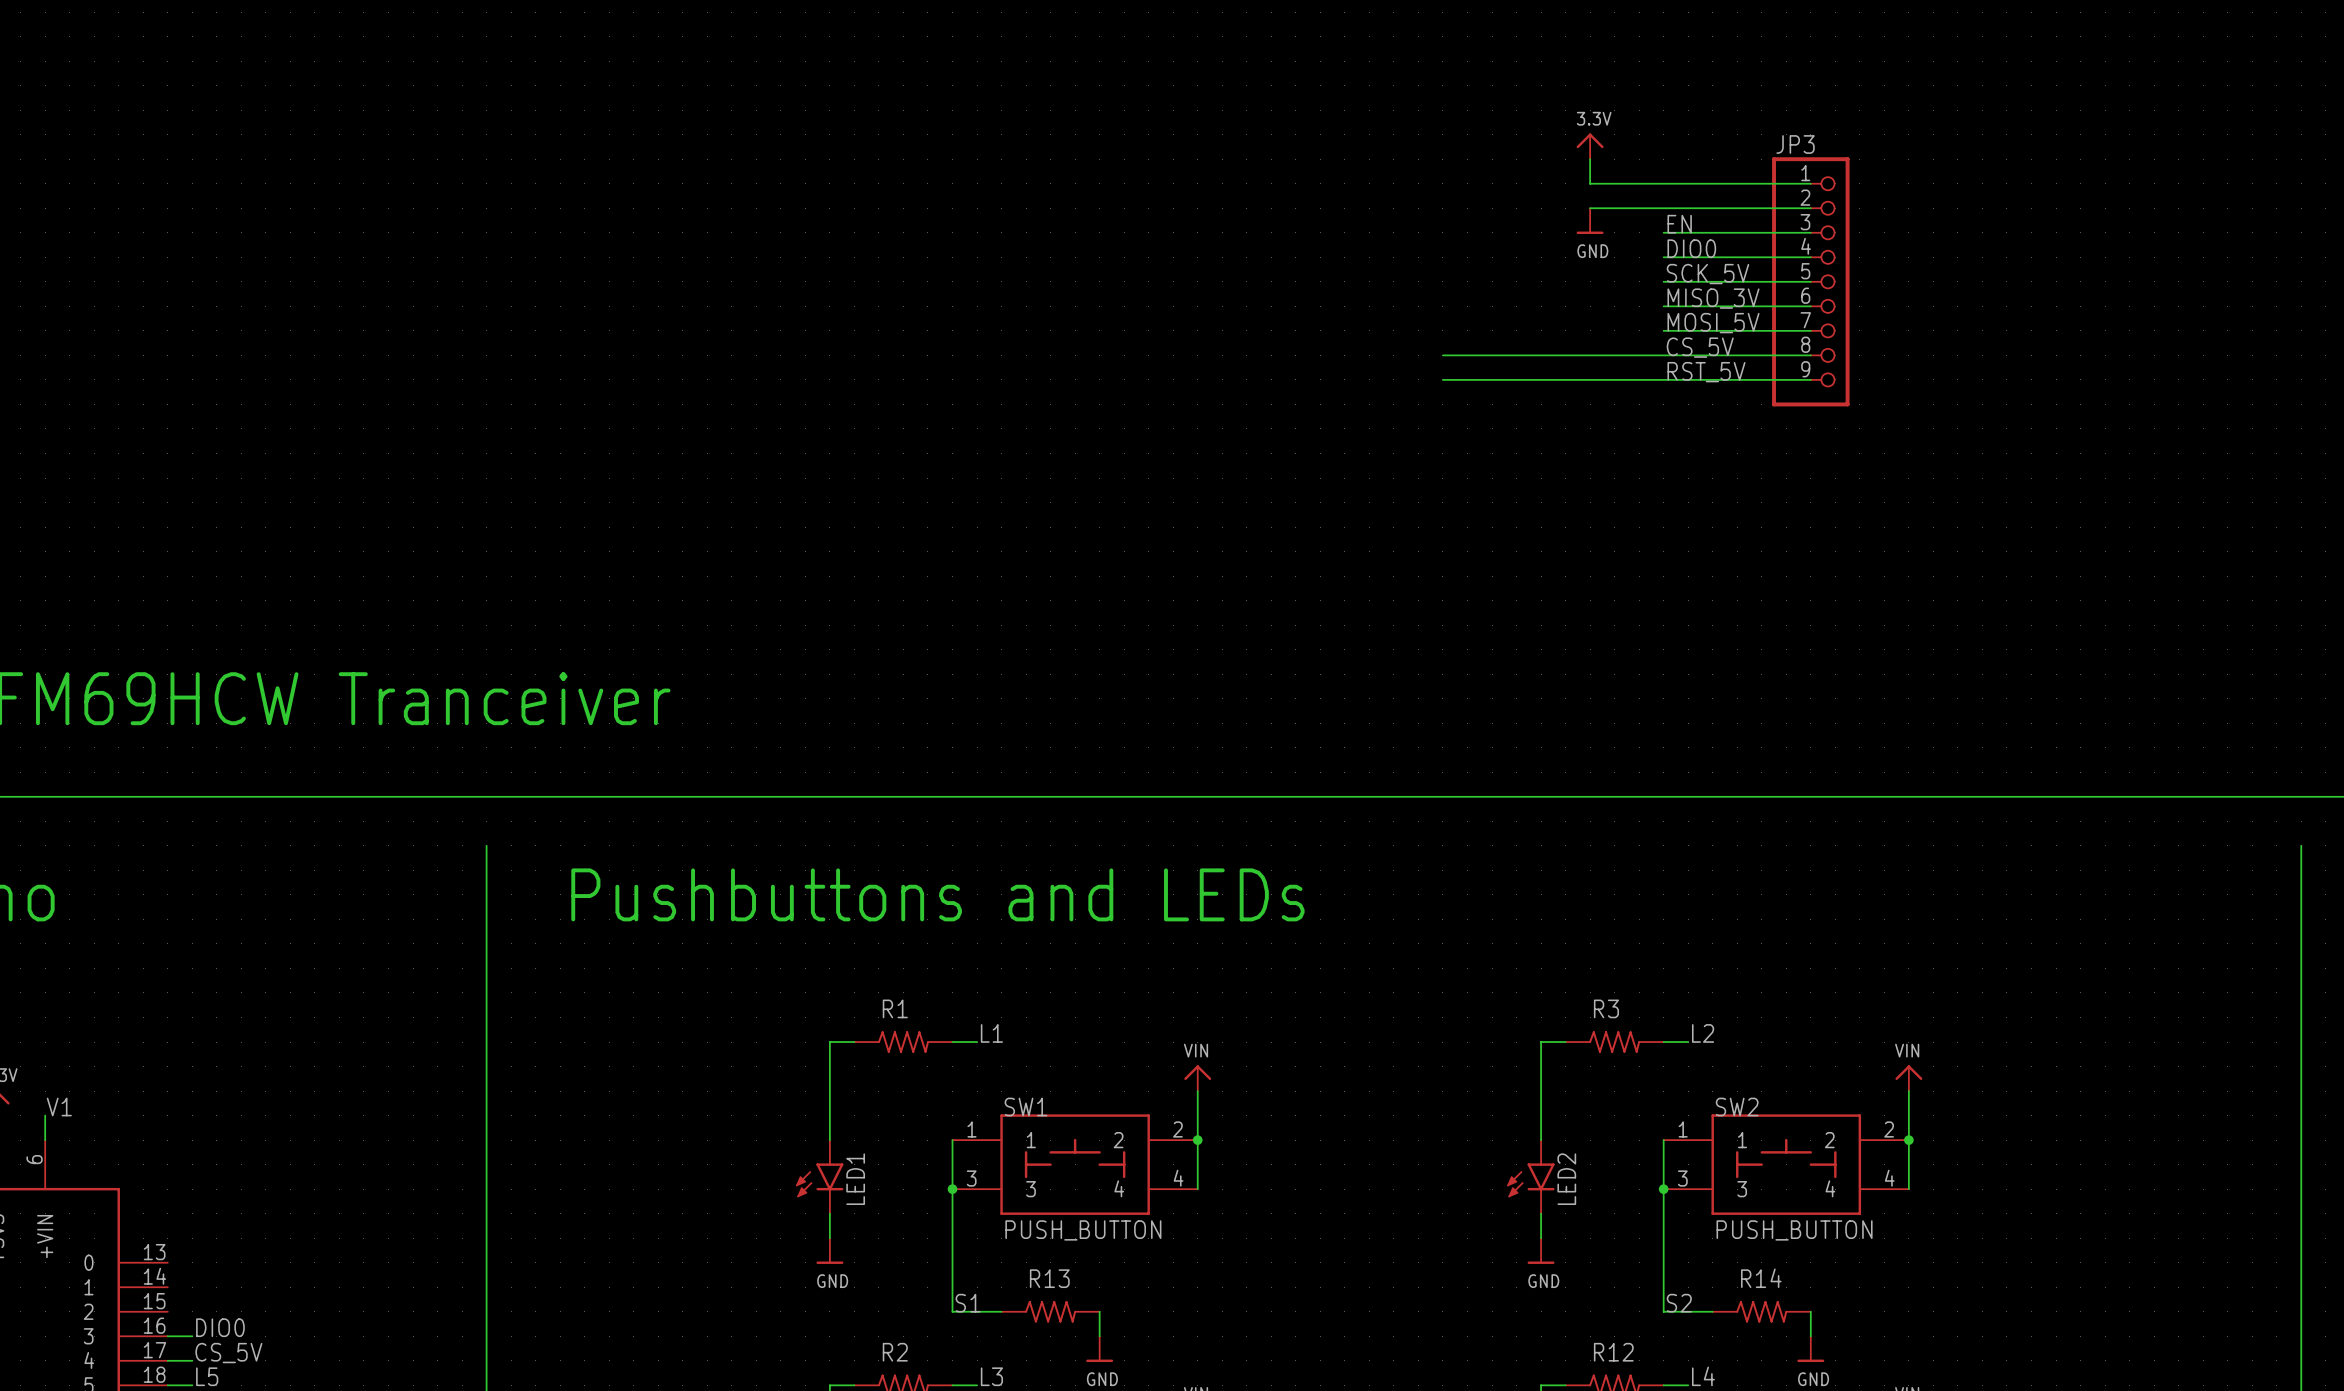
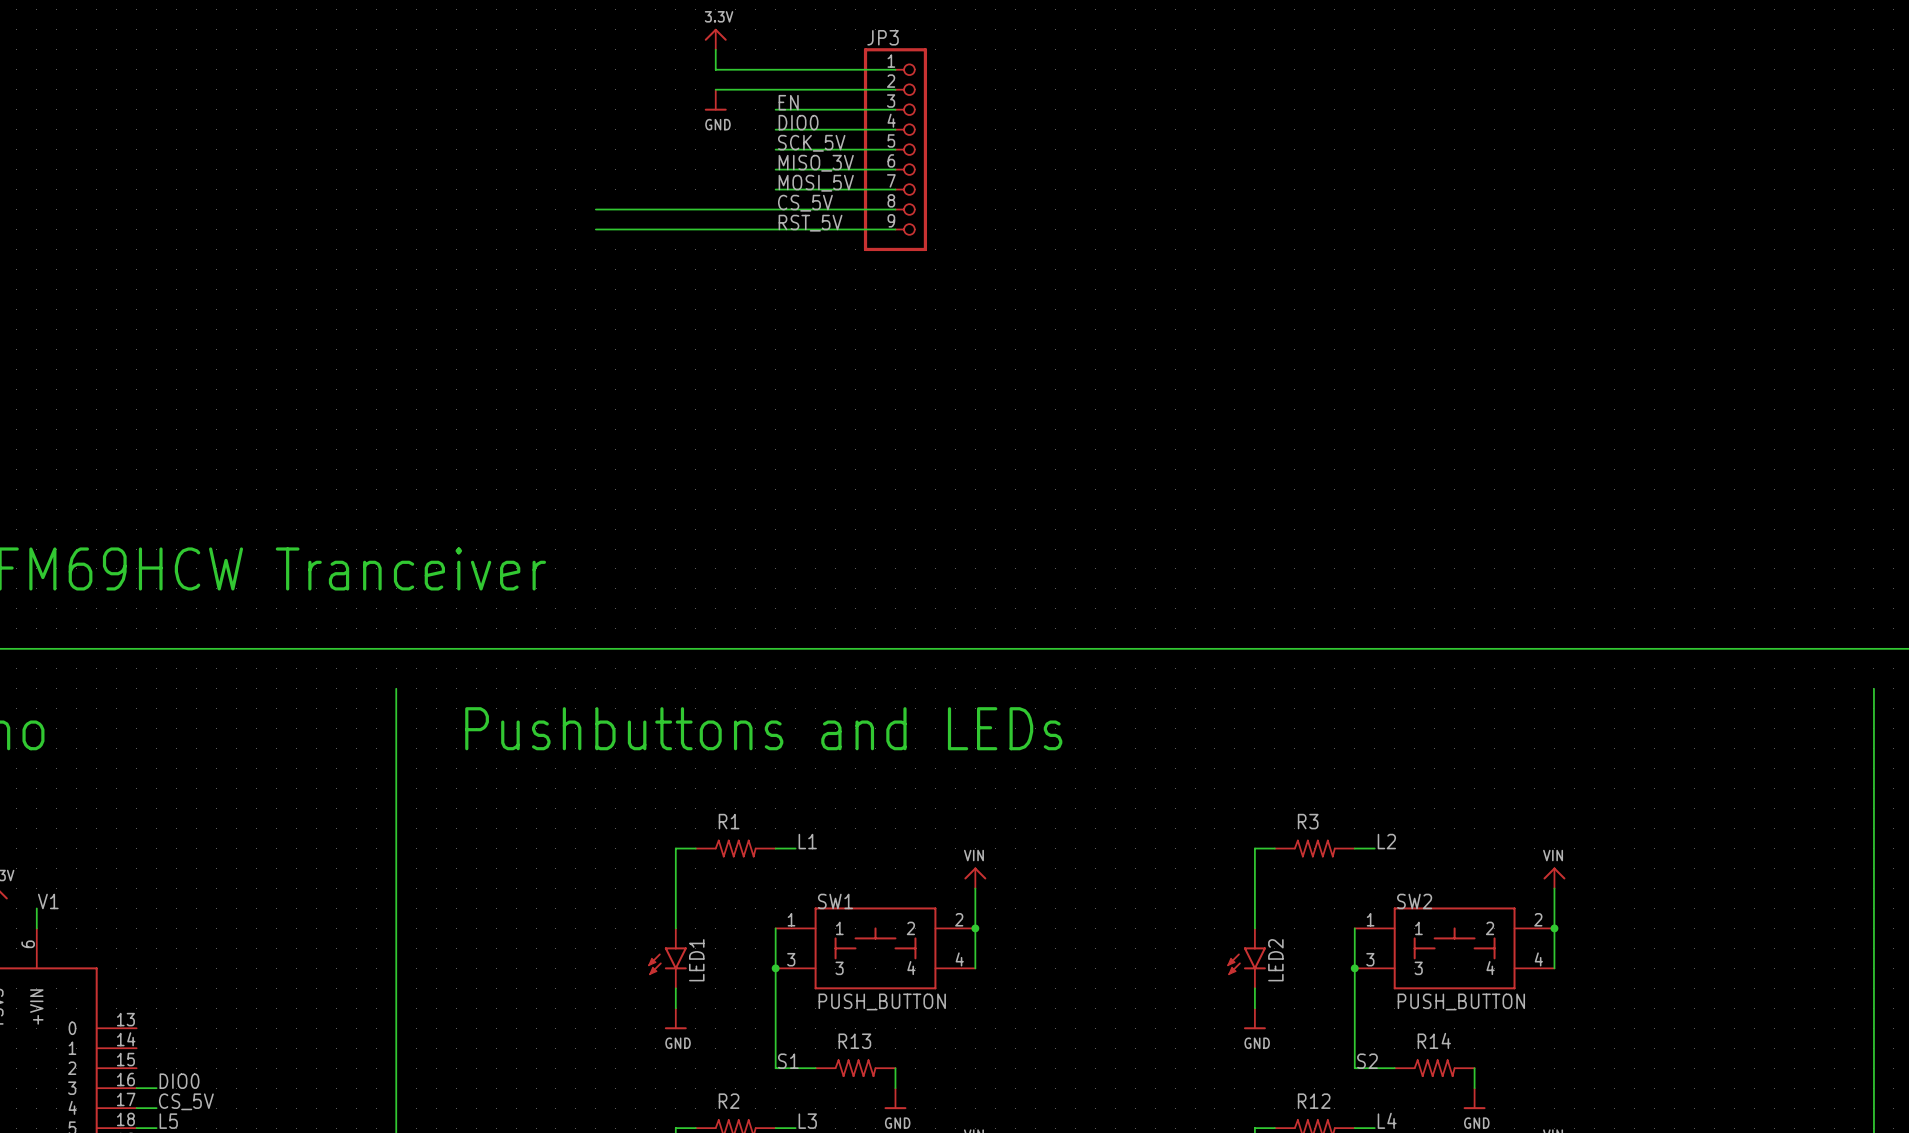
power symbol: none -> 3.3V (715, 39)
wire: none -> (715, 49) (715, 69) (895, 69)
wire: none -> (715, 89) (895, 89)
power symbol: none -> GND (715, 100)
label: none -> EN (788, 102)
wire: none -> (775, 109) (895, 109)
power symbol: 3.3V (1590, 146) -> none
label: none -> DIO0 (798, 122)
wire: none -> (775, 129) (895, 129)
wire: (1590, 159) (1590, 183) (1810, 183) -> none
label: none -> SCK_5V (811, 143)
wire: none -> (775, 149) (895, 149)
label: none -> MISO_3V (816, 163)
wire: none -> (775, 169) (895, 169)
wire: (1590, 208) (1810, 208) -> none
power symbol: GND (1590, 221) -> none
label: EN (1679, 224) -> none
label: none -> MOSI_5V (816, 183)
wire: none -> (775, 189) (895, 189)
wire: (1663, 232) (1810, 232) -> none
label: DIO0 (1691, 248) -> none
label: none -> CS_5V (805, 203)
wire: none -> (595, 209) (895, 209)
wire: (1663, 257) (1810, 257) -> none
label: none -> RST_5V (810, 223)
label: SCK_5V (1707, 274) -> none
wire: none -> (595, 229) (895, 229)
wire: (1663, 281) (1810, 281) -> none
JP3 position: (1810, 281) -> (895, 149)
label: MISO_3V (1713, 298) -> none
wire: (1663, 306) (1810, 306) -> none
label: MOSI_5V (1713, 323) -> none
wire: (1663, 330) (1810, 330) -> none
label: CS_5V (1700, 347) -> none
wire: (1442, 355) (1810, 355) -> none
label: RST_5V (1706, 372) -> none
wire: (1442, 379) (1810, 379) -> none

